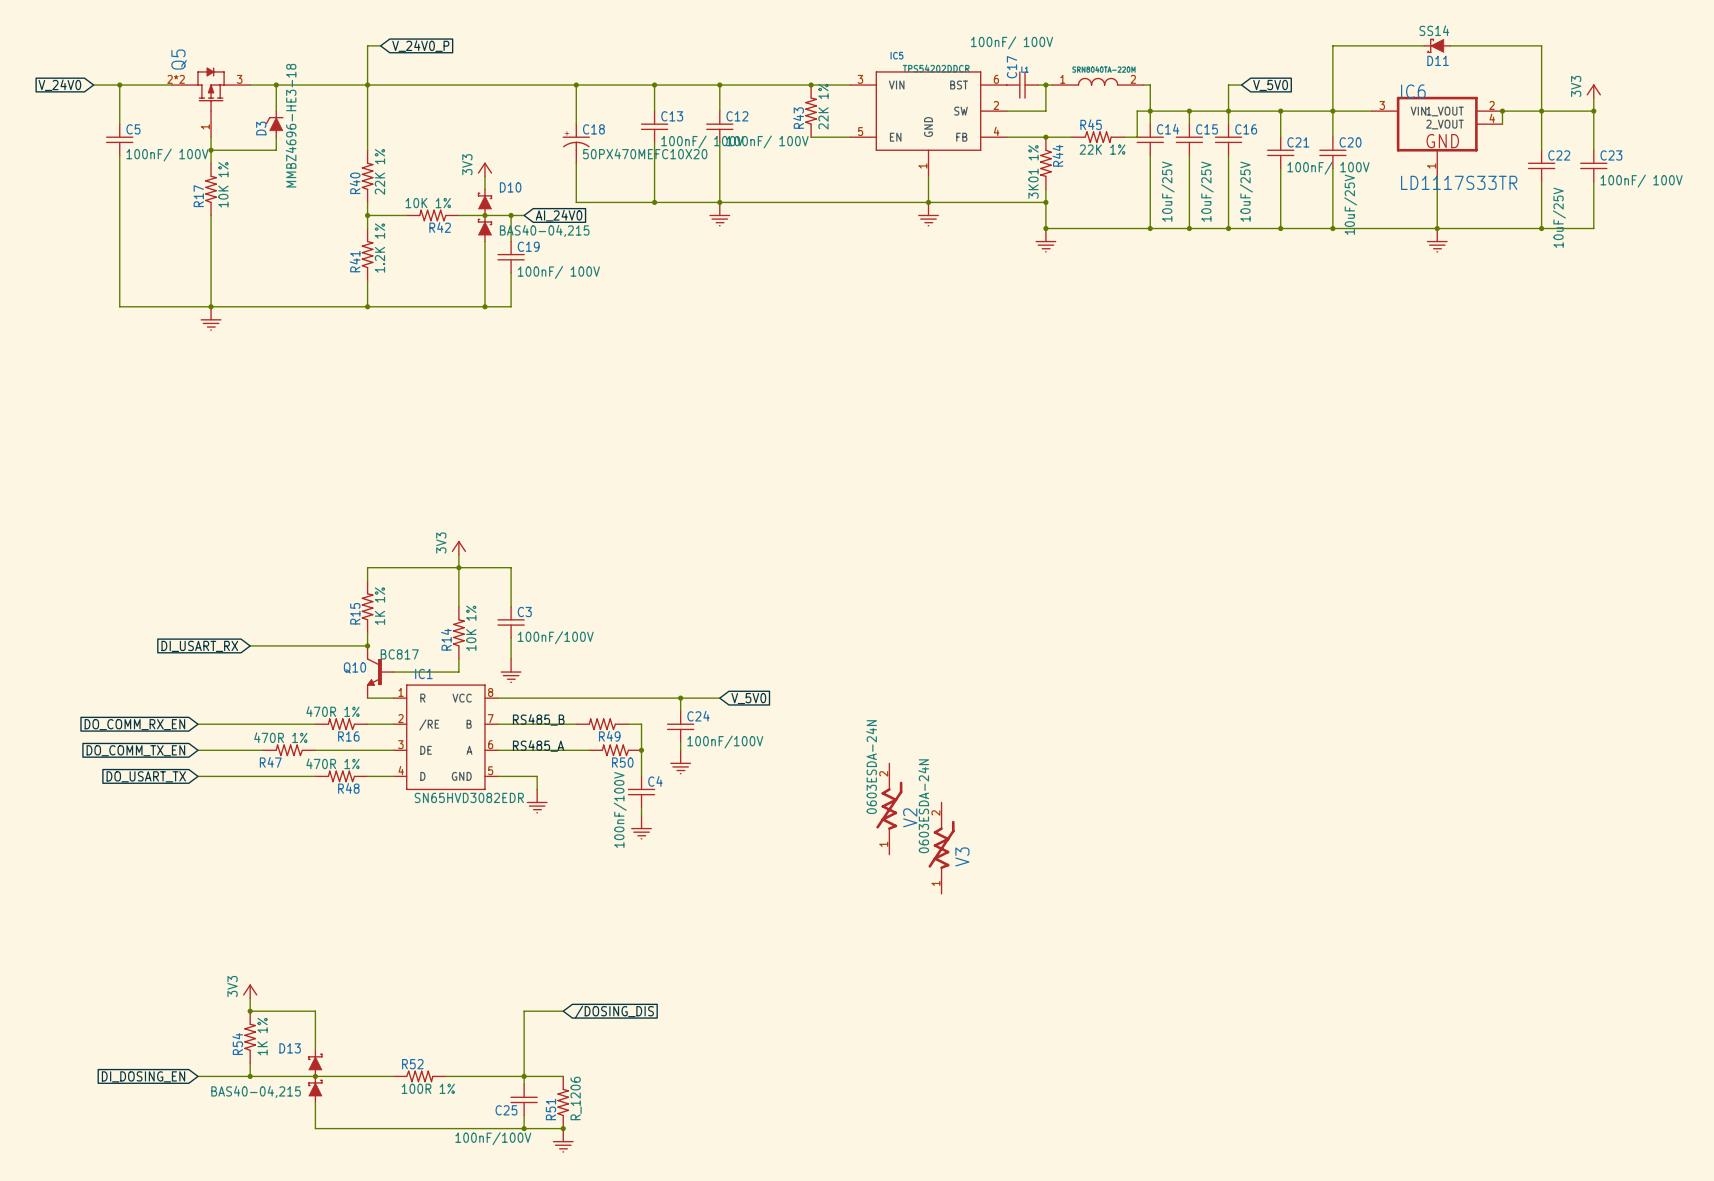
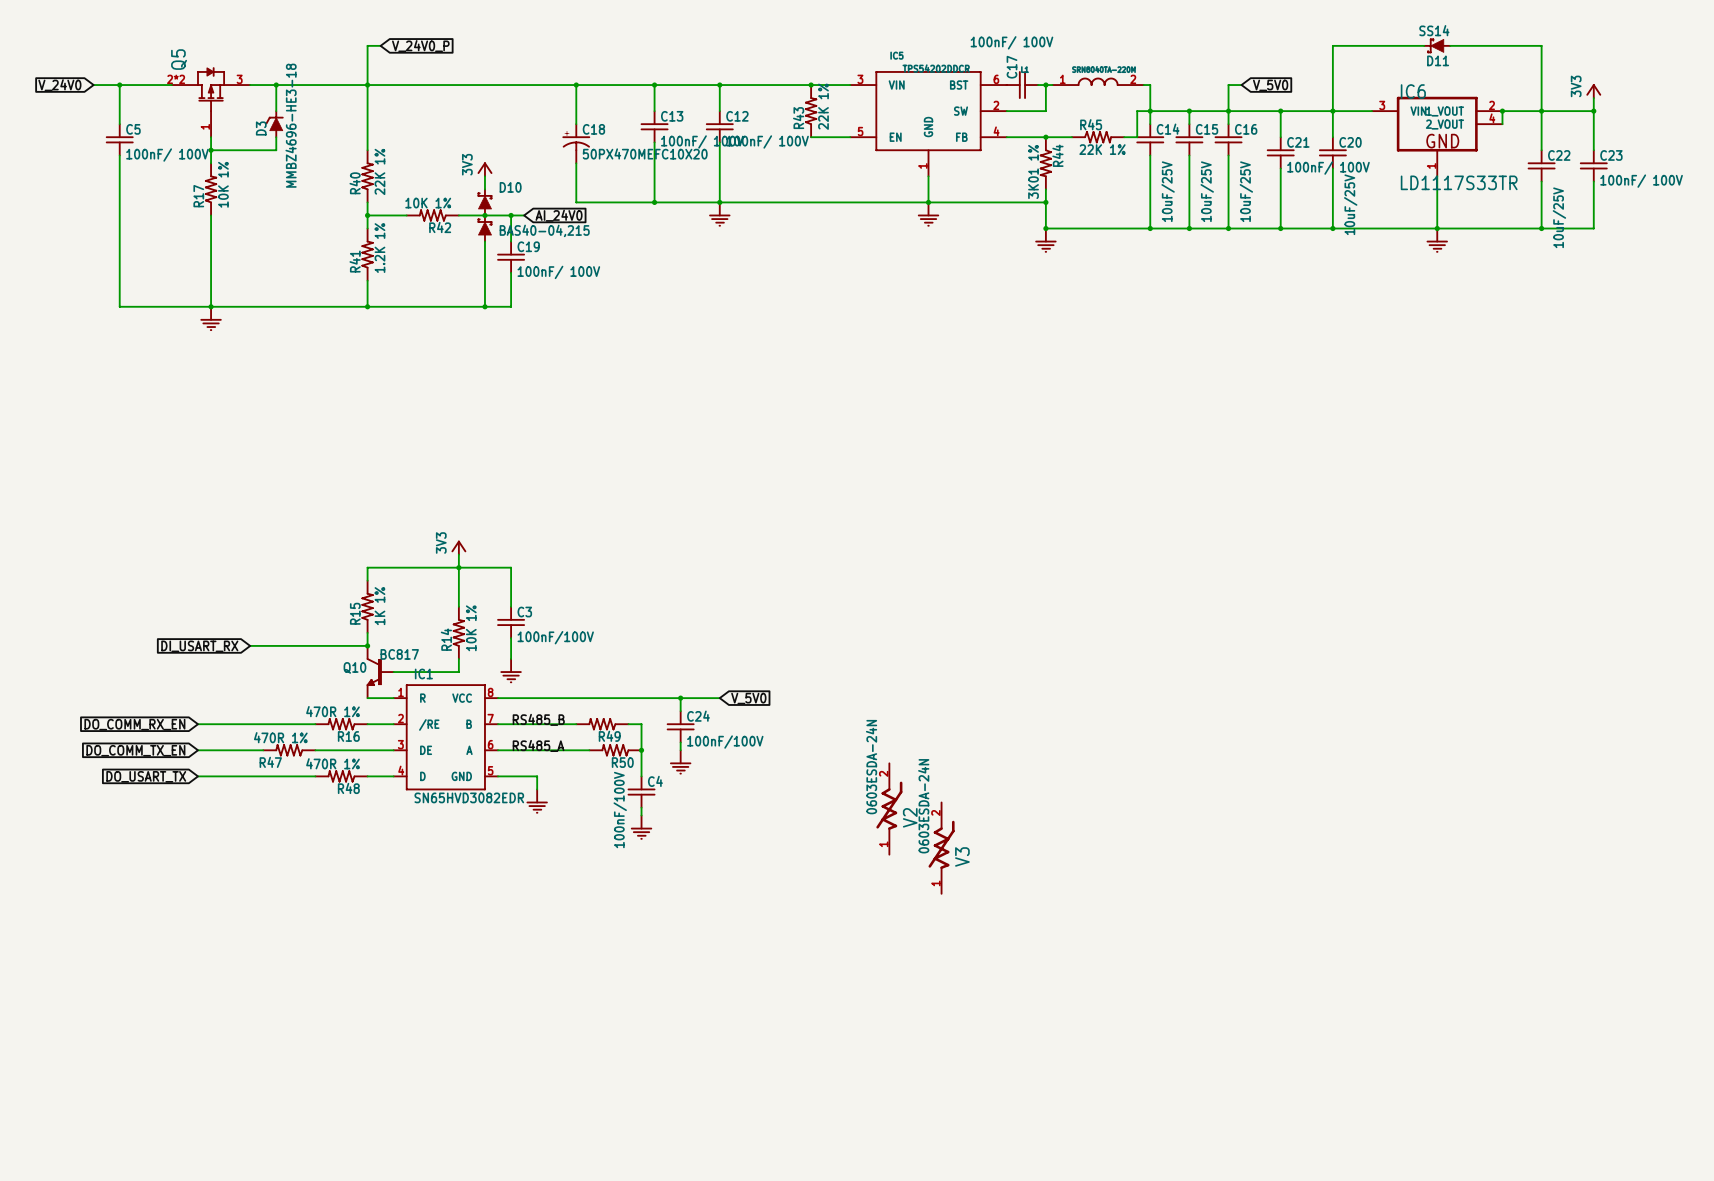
power symbol: 3V3 (250, 991) -> none
wire: (250, 998) (250, 1011) (315, 1011) (315, 1050) -> none
junction: (250, 1011) -> none
wire: (563, 1011) (524, 1011) (524, 1084) -> none
global label: /DOSING_DIS (614, 1012) -> none
R54: 1K 1% (250, 1037) -> none
wire: (250, 1063) (250, 1076) -> none
global label: DI_DOSING_EN (143, 1076) -> none
wire: (198, 1076) (393, 1076) -> none
junction: (250, 1076) -> none
D13: BAS40-04,215 (315, 1076) -> none
junction: (315, 1076) -> none
R52: 100R 1% (419, 1076) -> none
wire: (445, 1076) (563, 1076) -> none
junction: (524, 1076) -> none
C25: 100nF/100V (524, 1099) -> none
wire: (315, 1102) (315, 1128) (563, 1128) -> none
R51: R_1206 (563, 1102) -> none
wire: (524, 1115) (524, 1128) -> none
junction: (524, 1128) -> none
junction: (563, 1128) -> none
power symbol: (563, 1140) -> none

